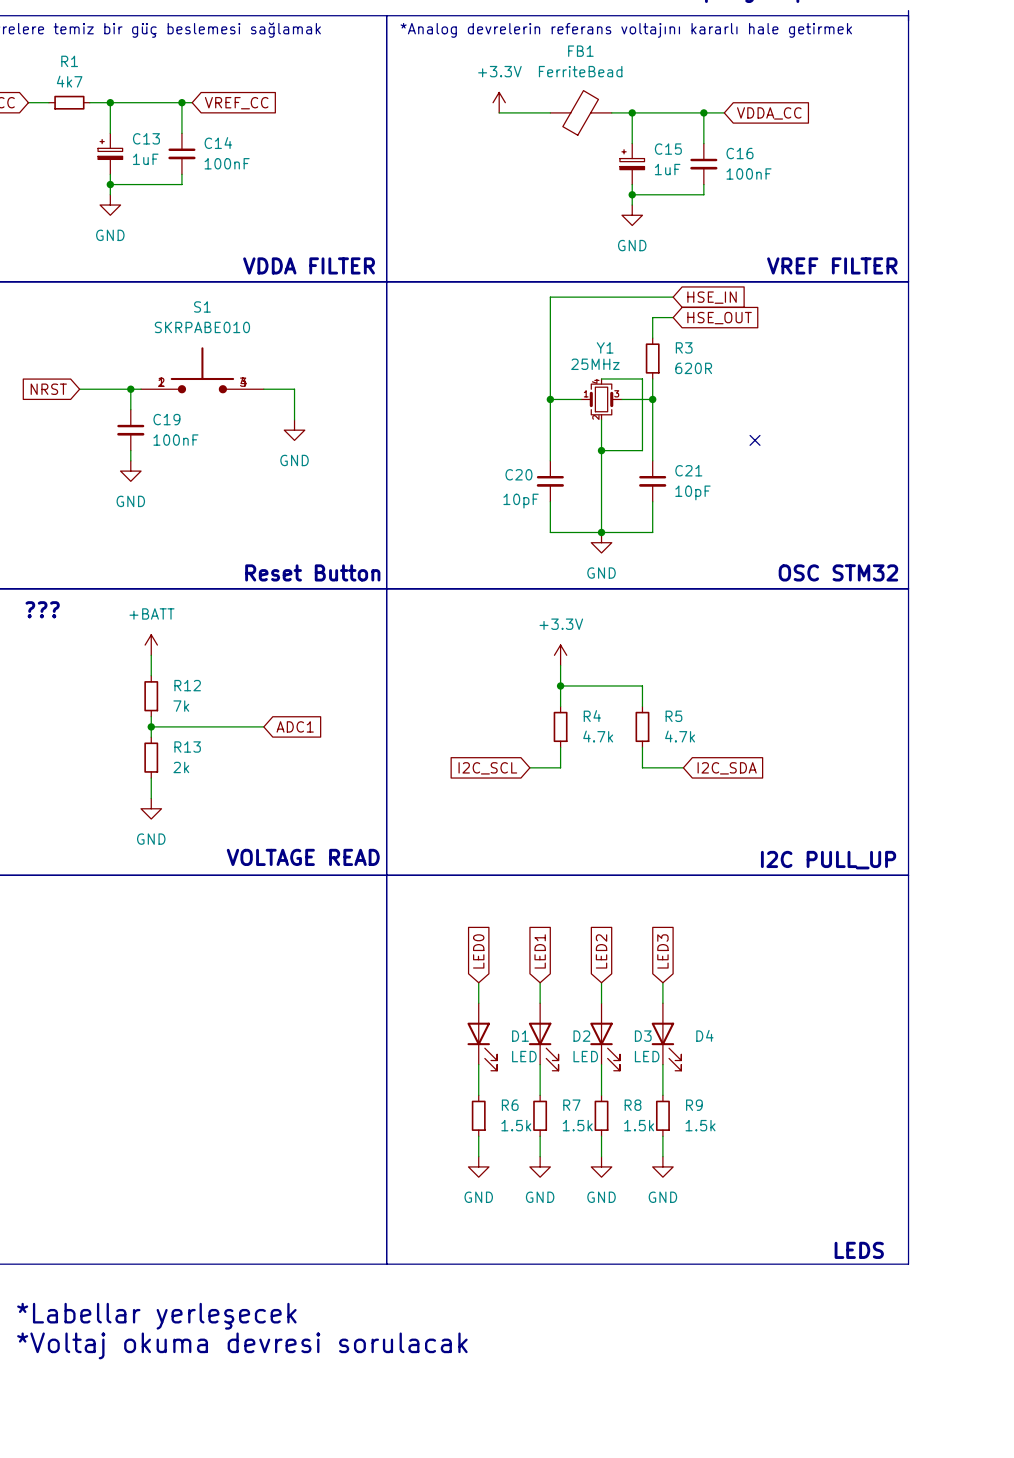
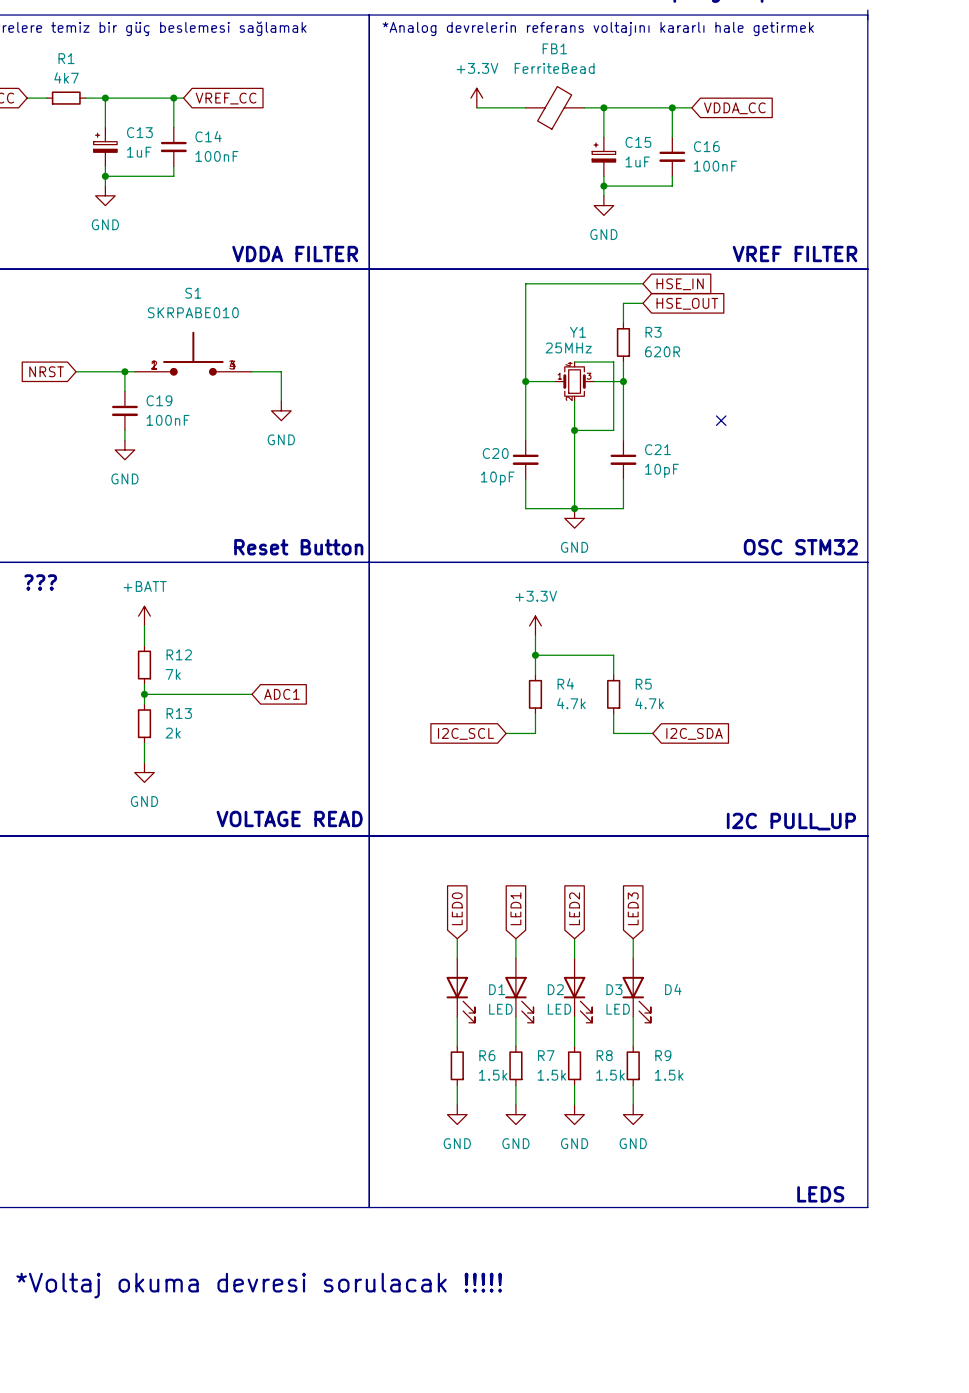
text: *Labellar yerleşecek (156, 1316) -> none
text: *Voltaj okuma devresi sorulacak (242, 1345) -> *Voltaj okuma devresi sorulacak !!!!! (259, 1285)

